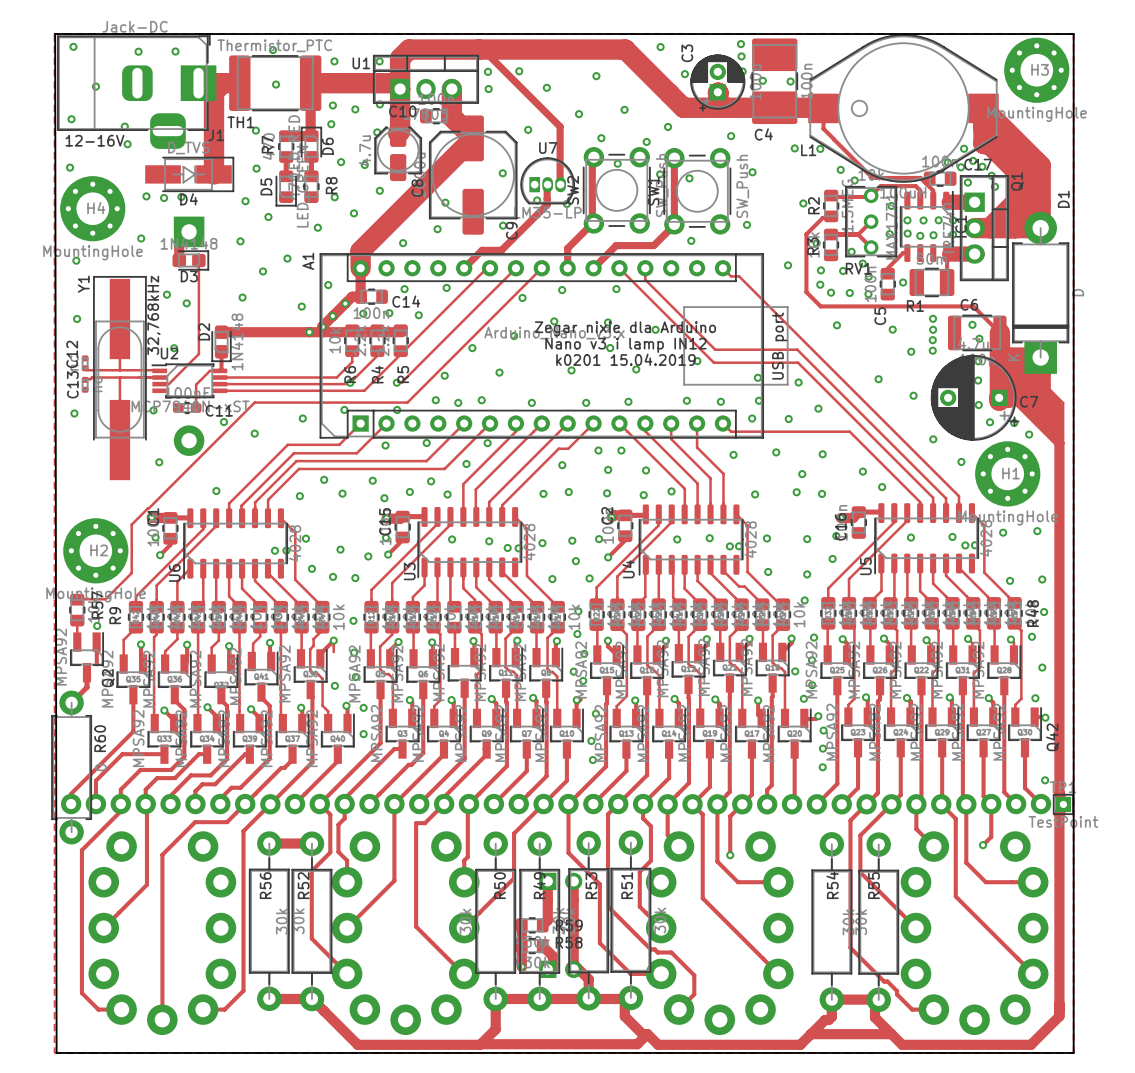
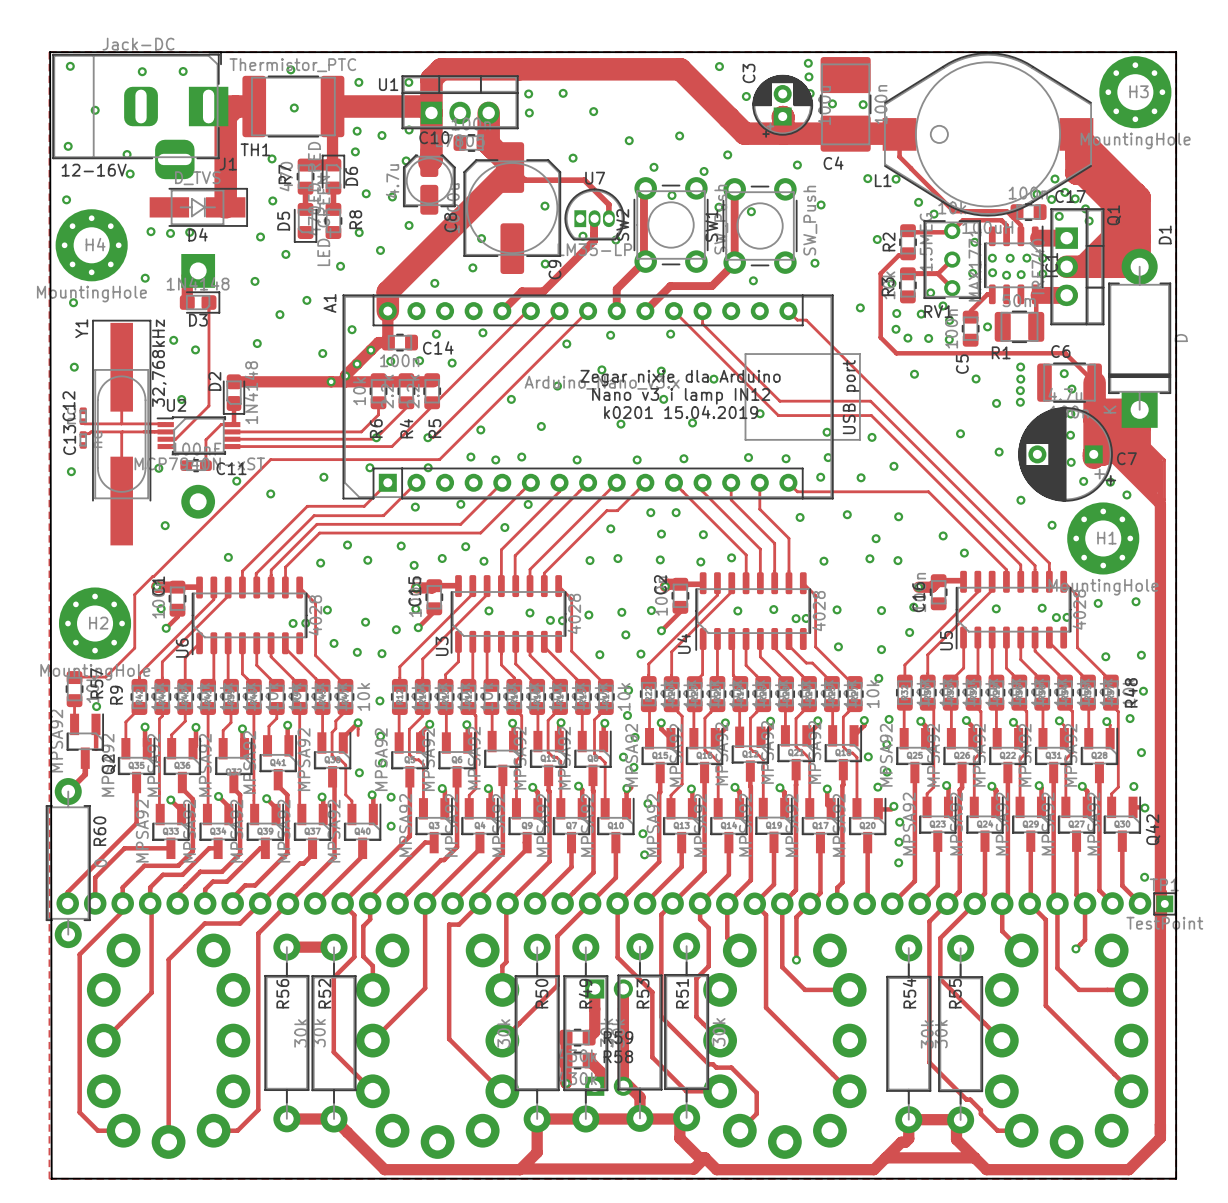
track: (482, 49) (560, 126) (560, 184) -> none
via: (596, 76) -> none
track: none -> (512, 167) (524, 180) (584, 180) (608, 204) (608, 218)

